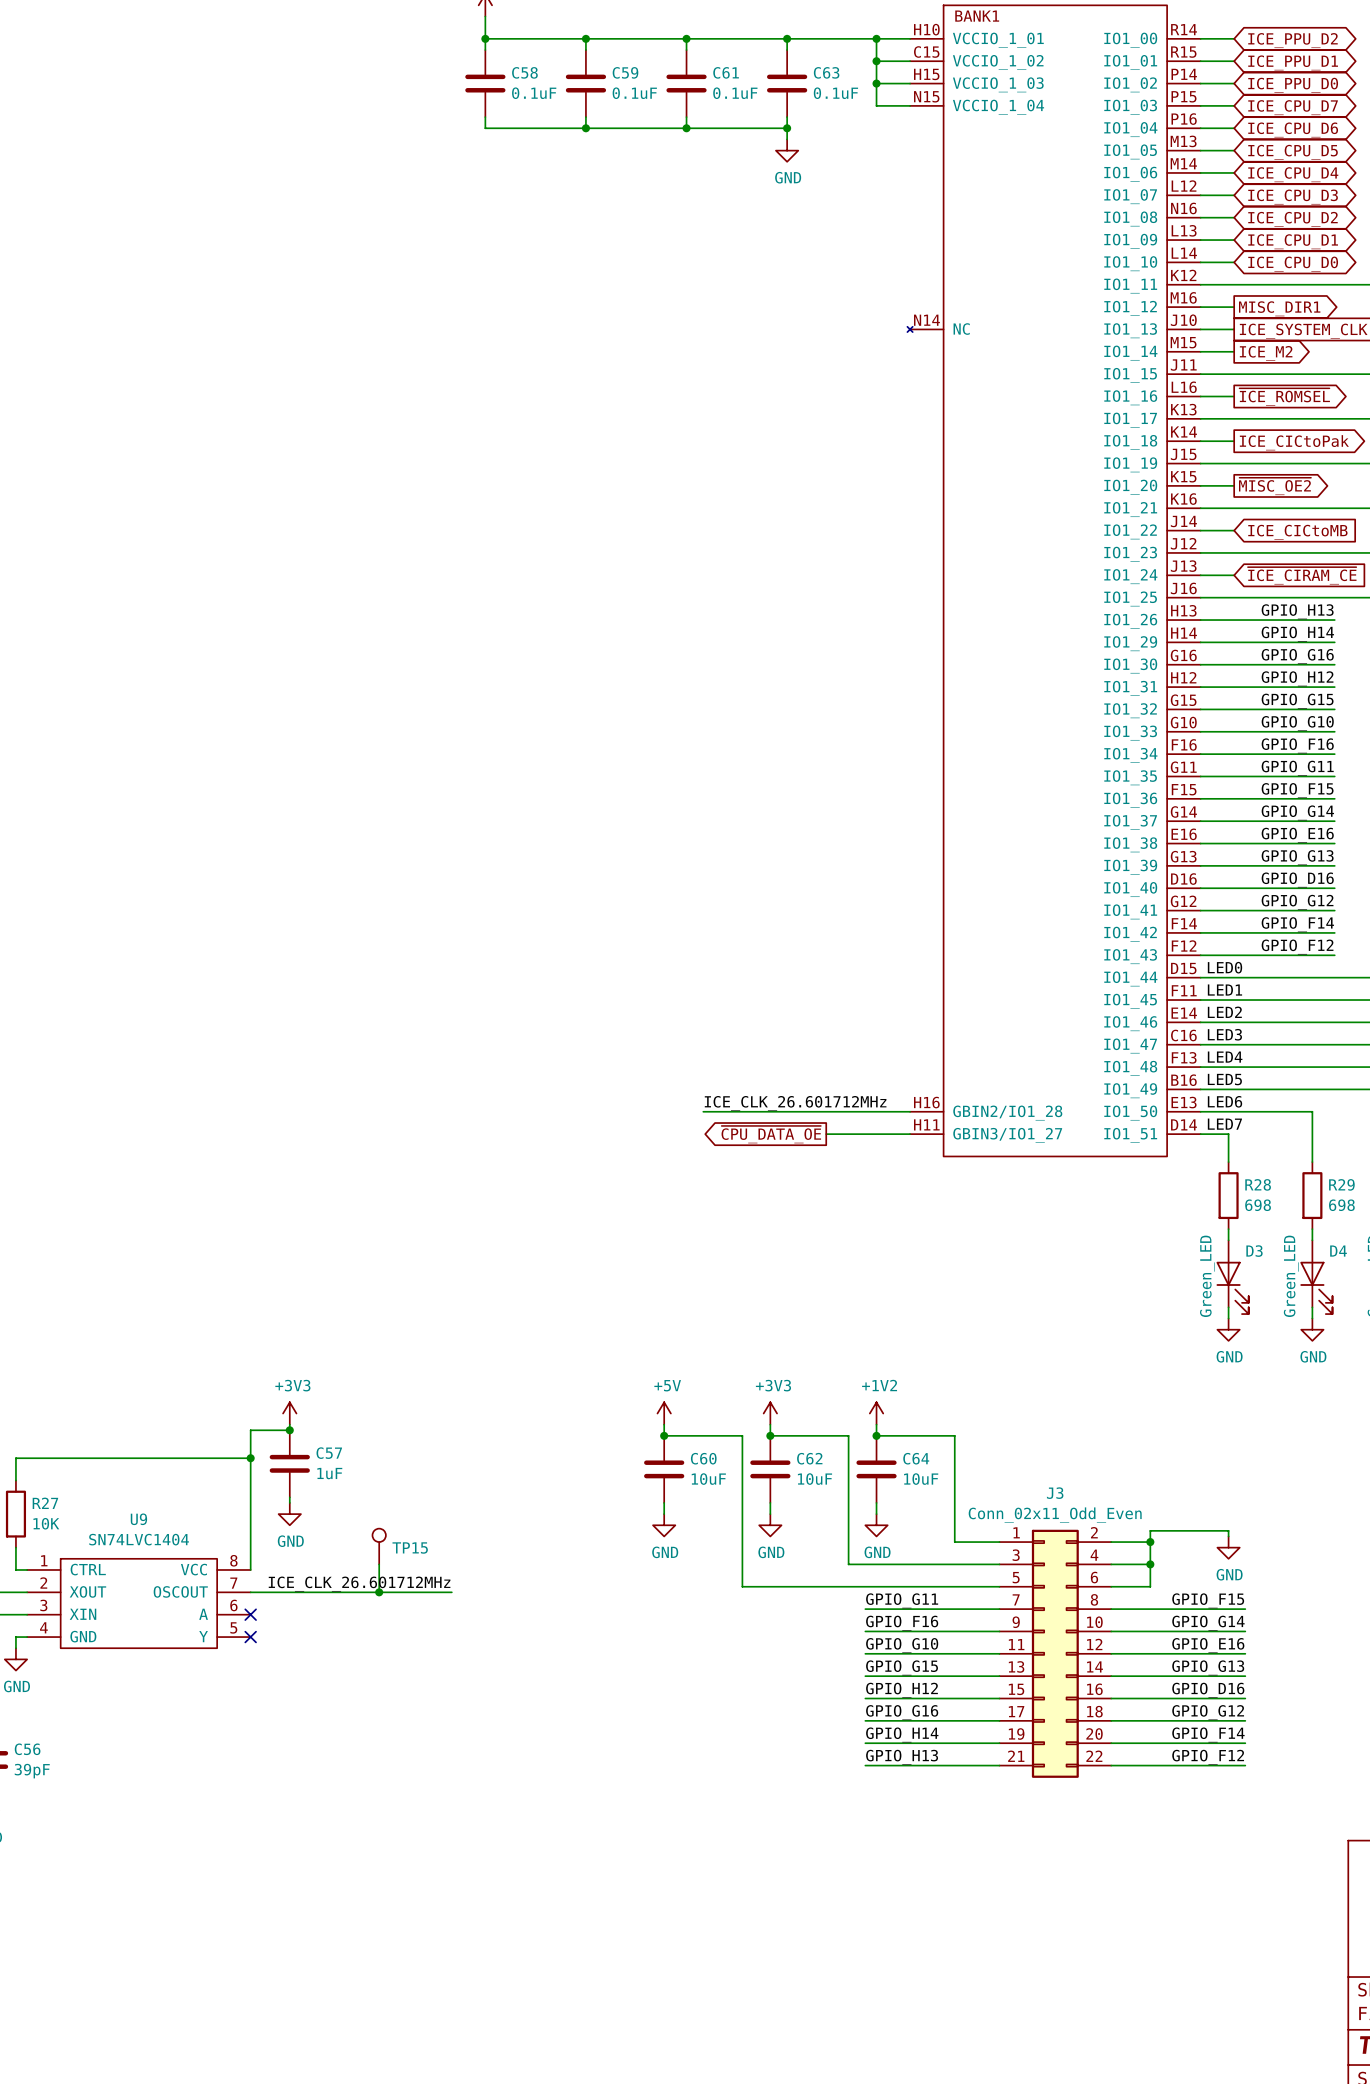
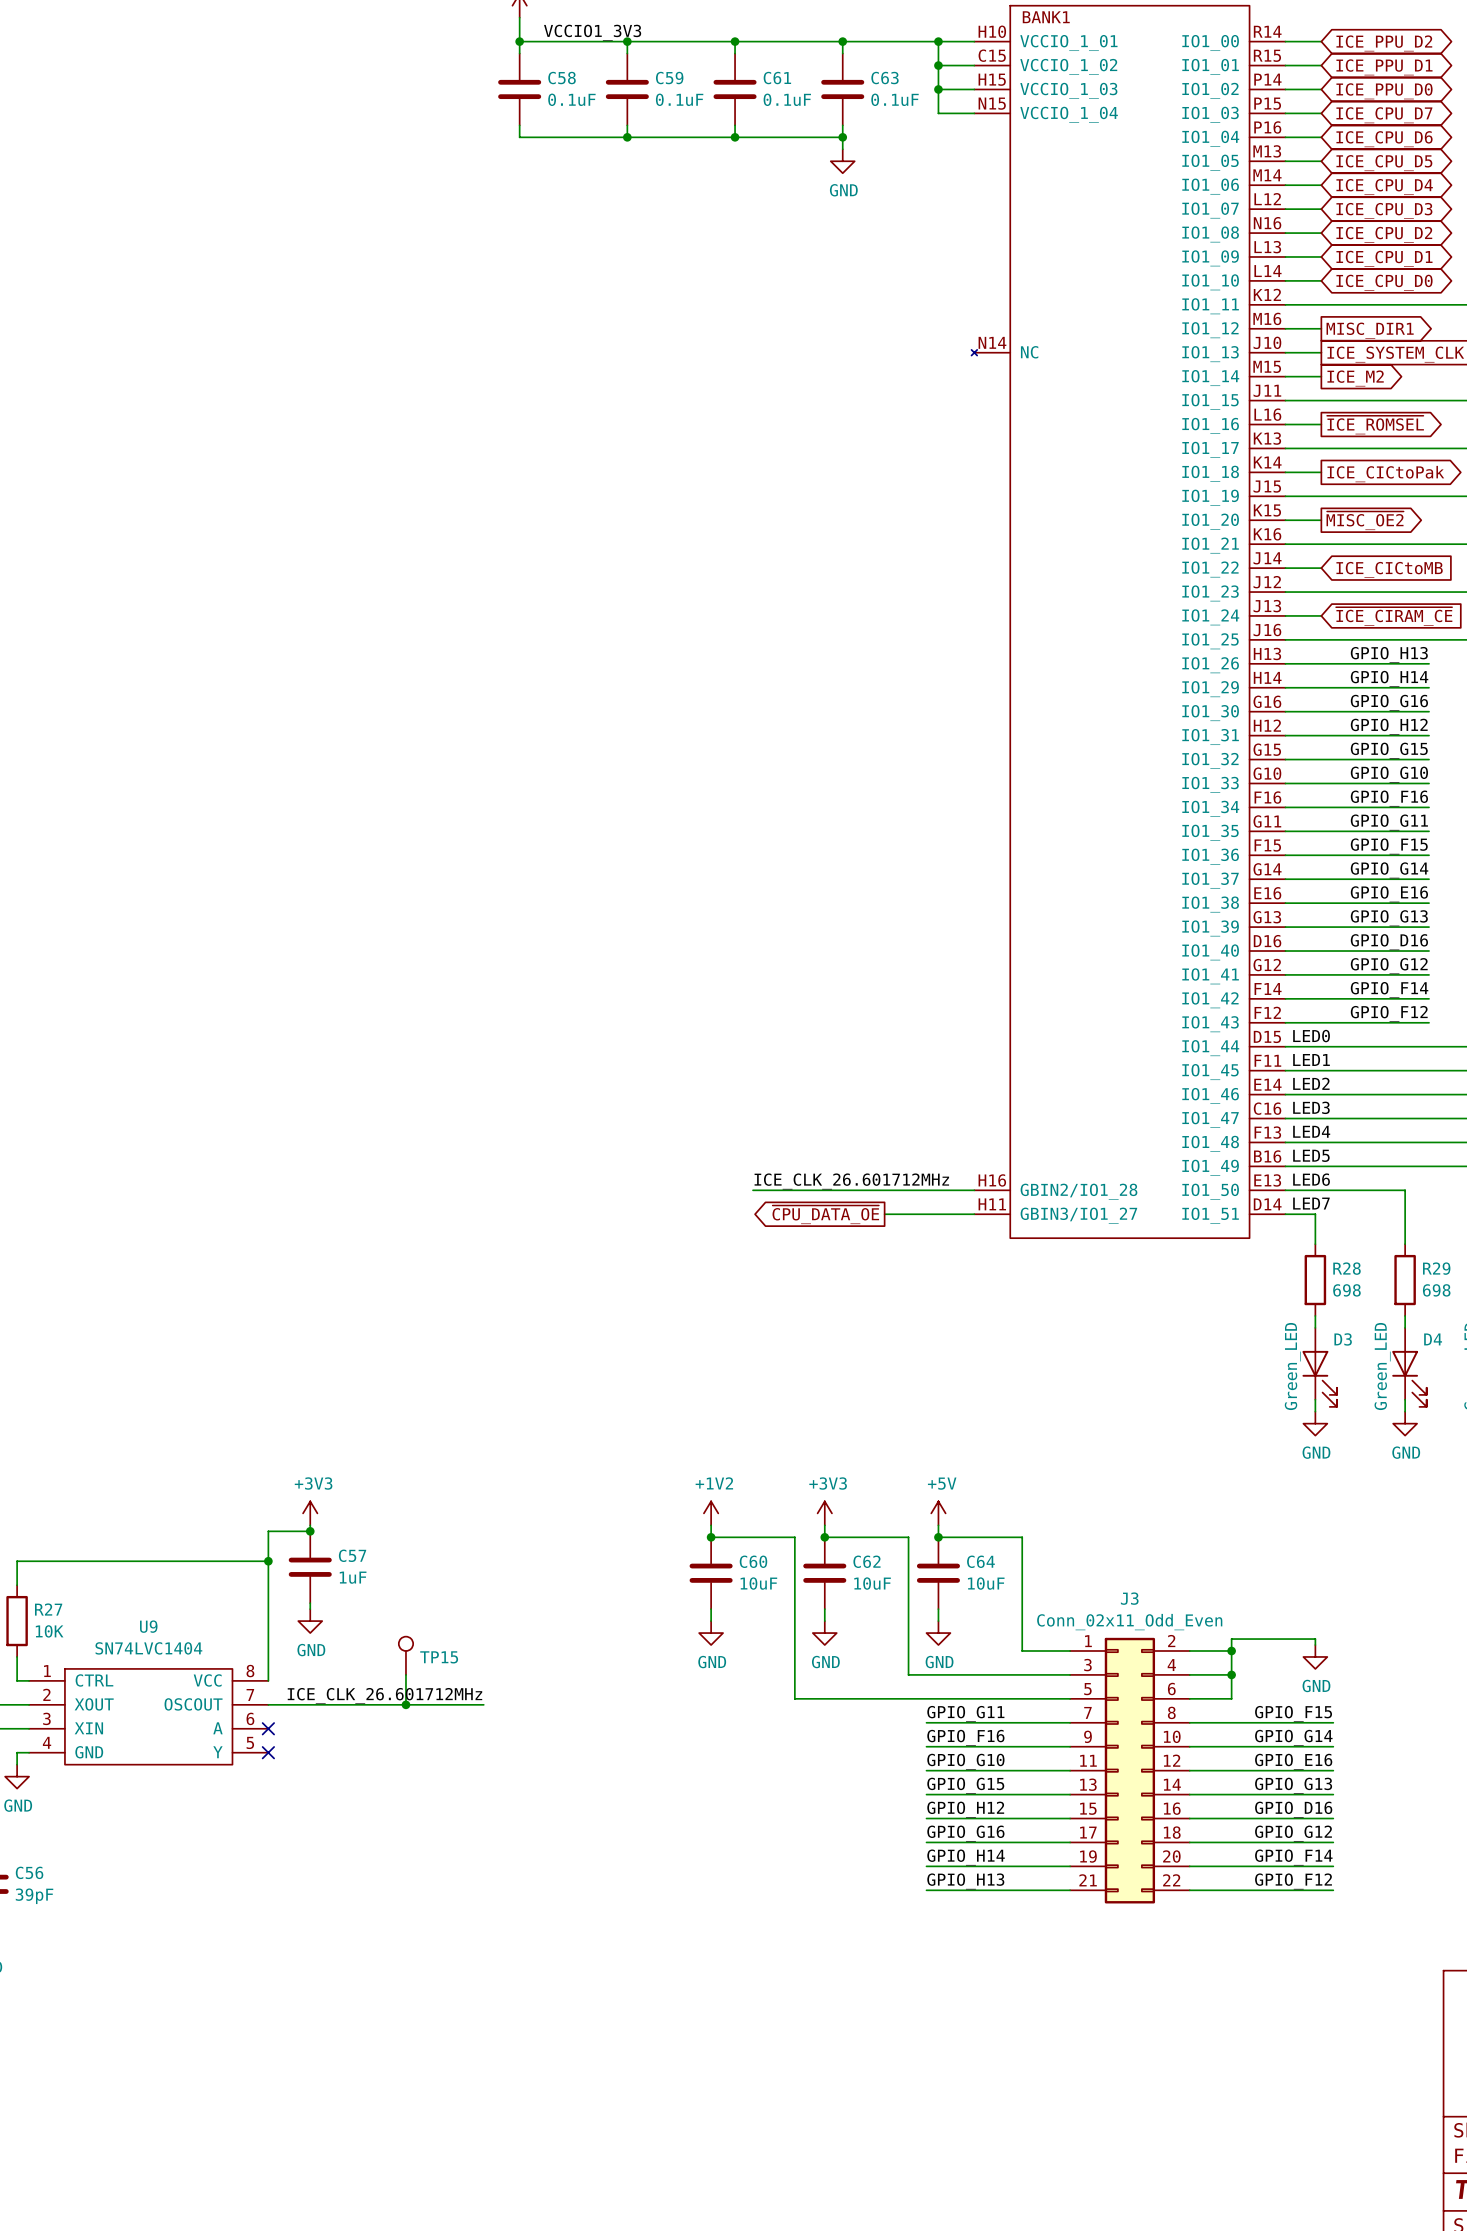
label: none -> VCCIO1_3V3 (592, 32)
power symbol: +5V (664, 1413) -> +1V2 (711, 1513)
power symbol: +1V2 (876, 1413) -> +5V (938, 1513)

